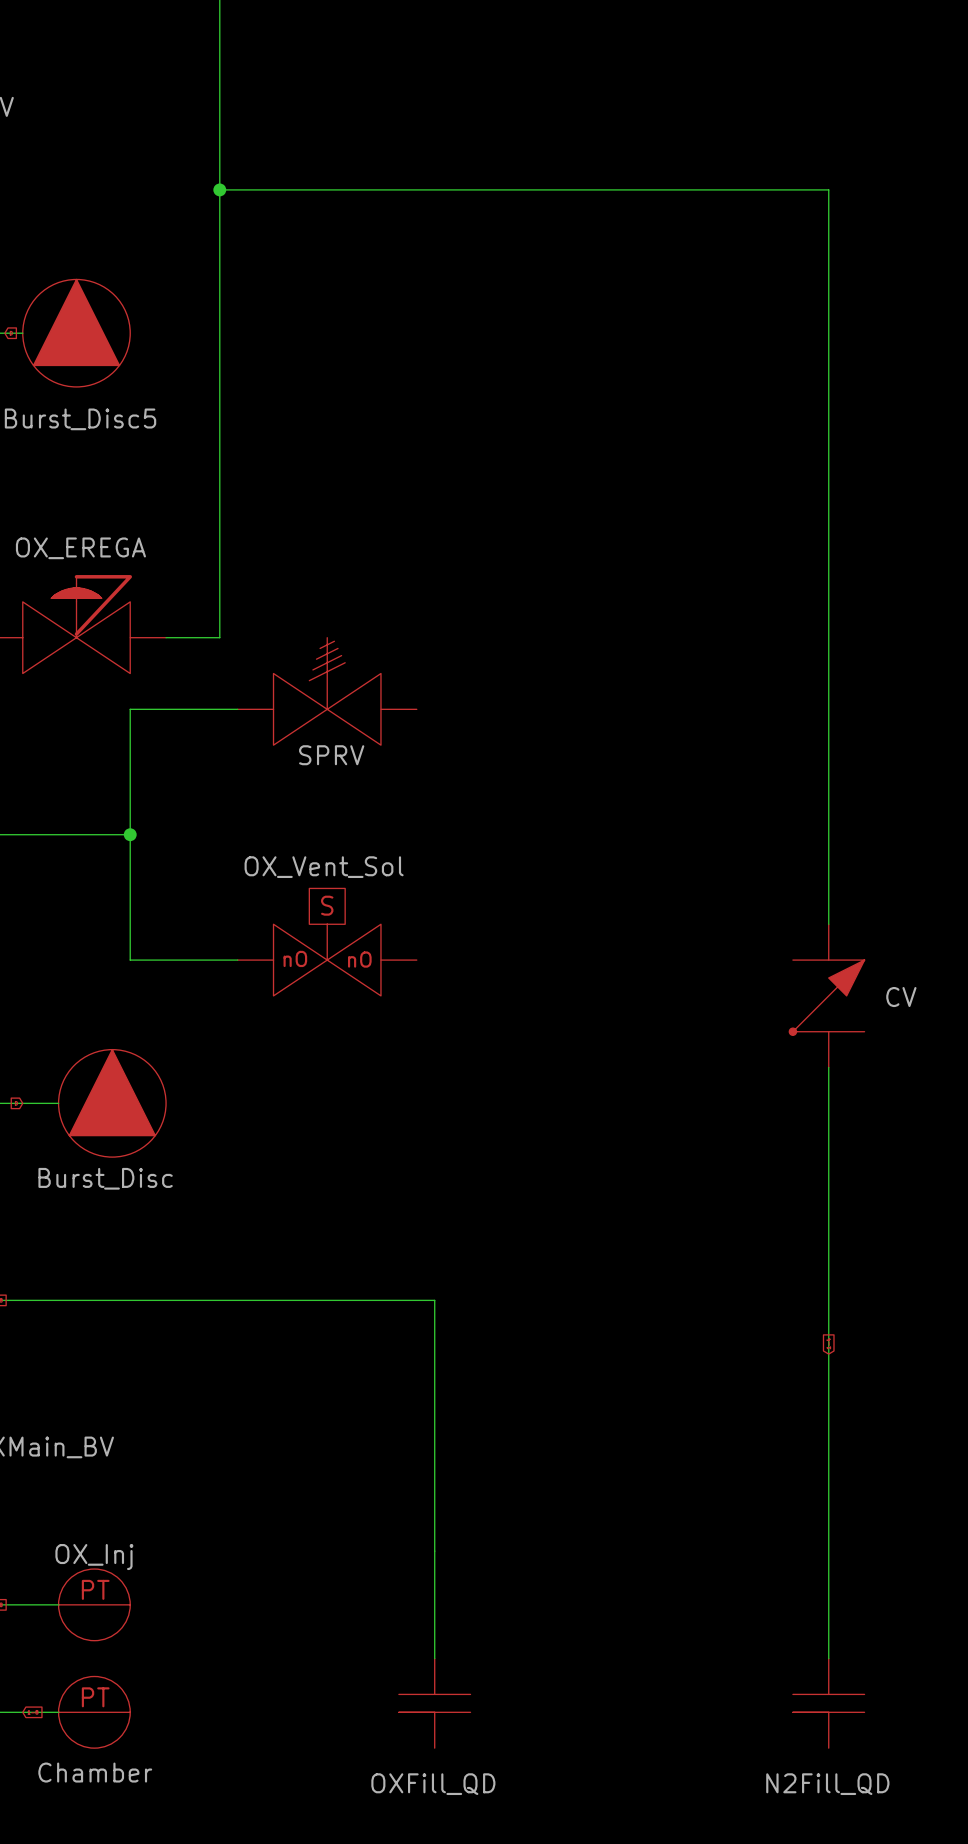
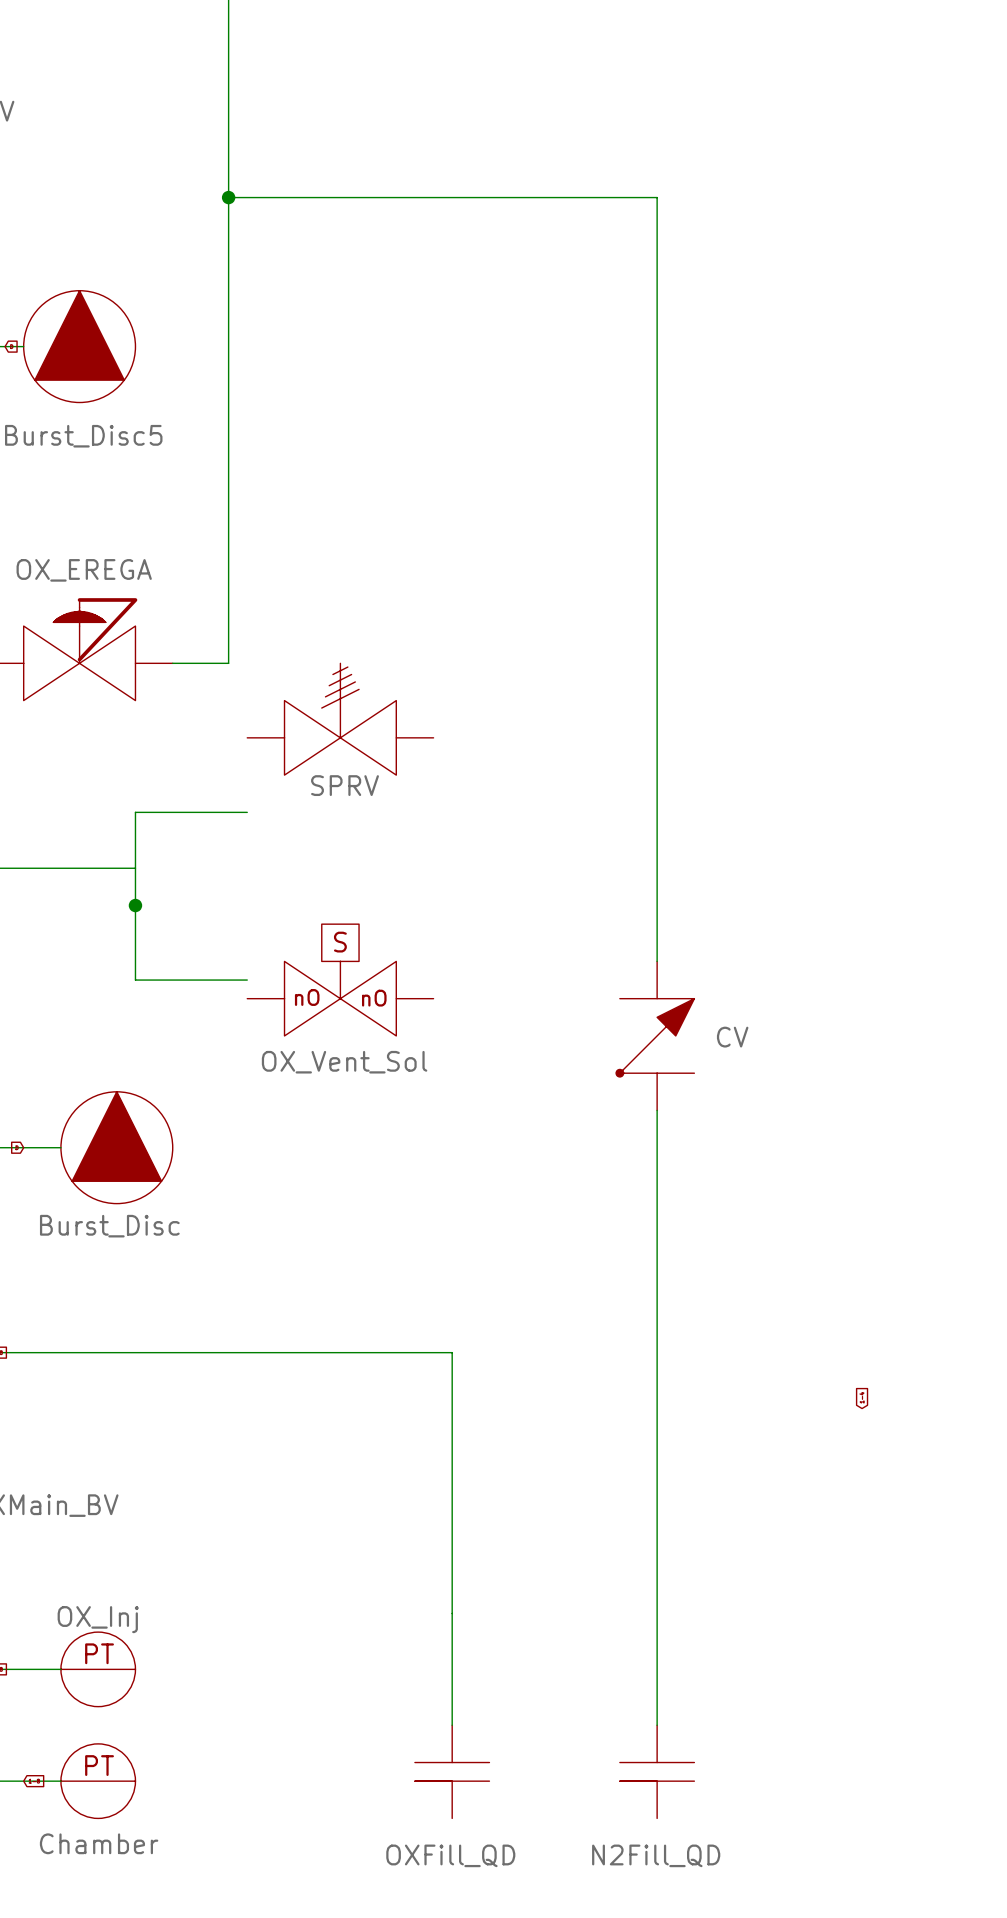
wire: (631, 189) (828, 189) (828, 924) -> (657, 197) (657, 961)
wire: (237, 709) (130, 709) (130, 780) -> (247, 812) (135, 812)
junction position: (130, 834) -> (135, 905)
OX_Vent_Sol name position: OX_Vent_Sol (324, 867) -> OX_Vent_Sol (344, 1062)
wire: (130, 942) (130, 960) (237, 960) -> (135, 980) (247, 980)
CV position: (826, 995) -> (655, 1035)
wire: (828, 1067) (828, 1658) -> (657, 1110) (657, 1725)
N2Fill_QD position: (828, 1703) -> (657, 1771)

